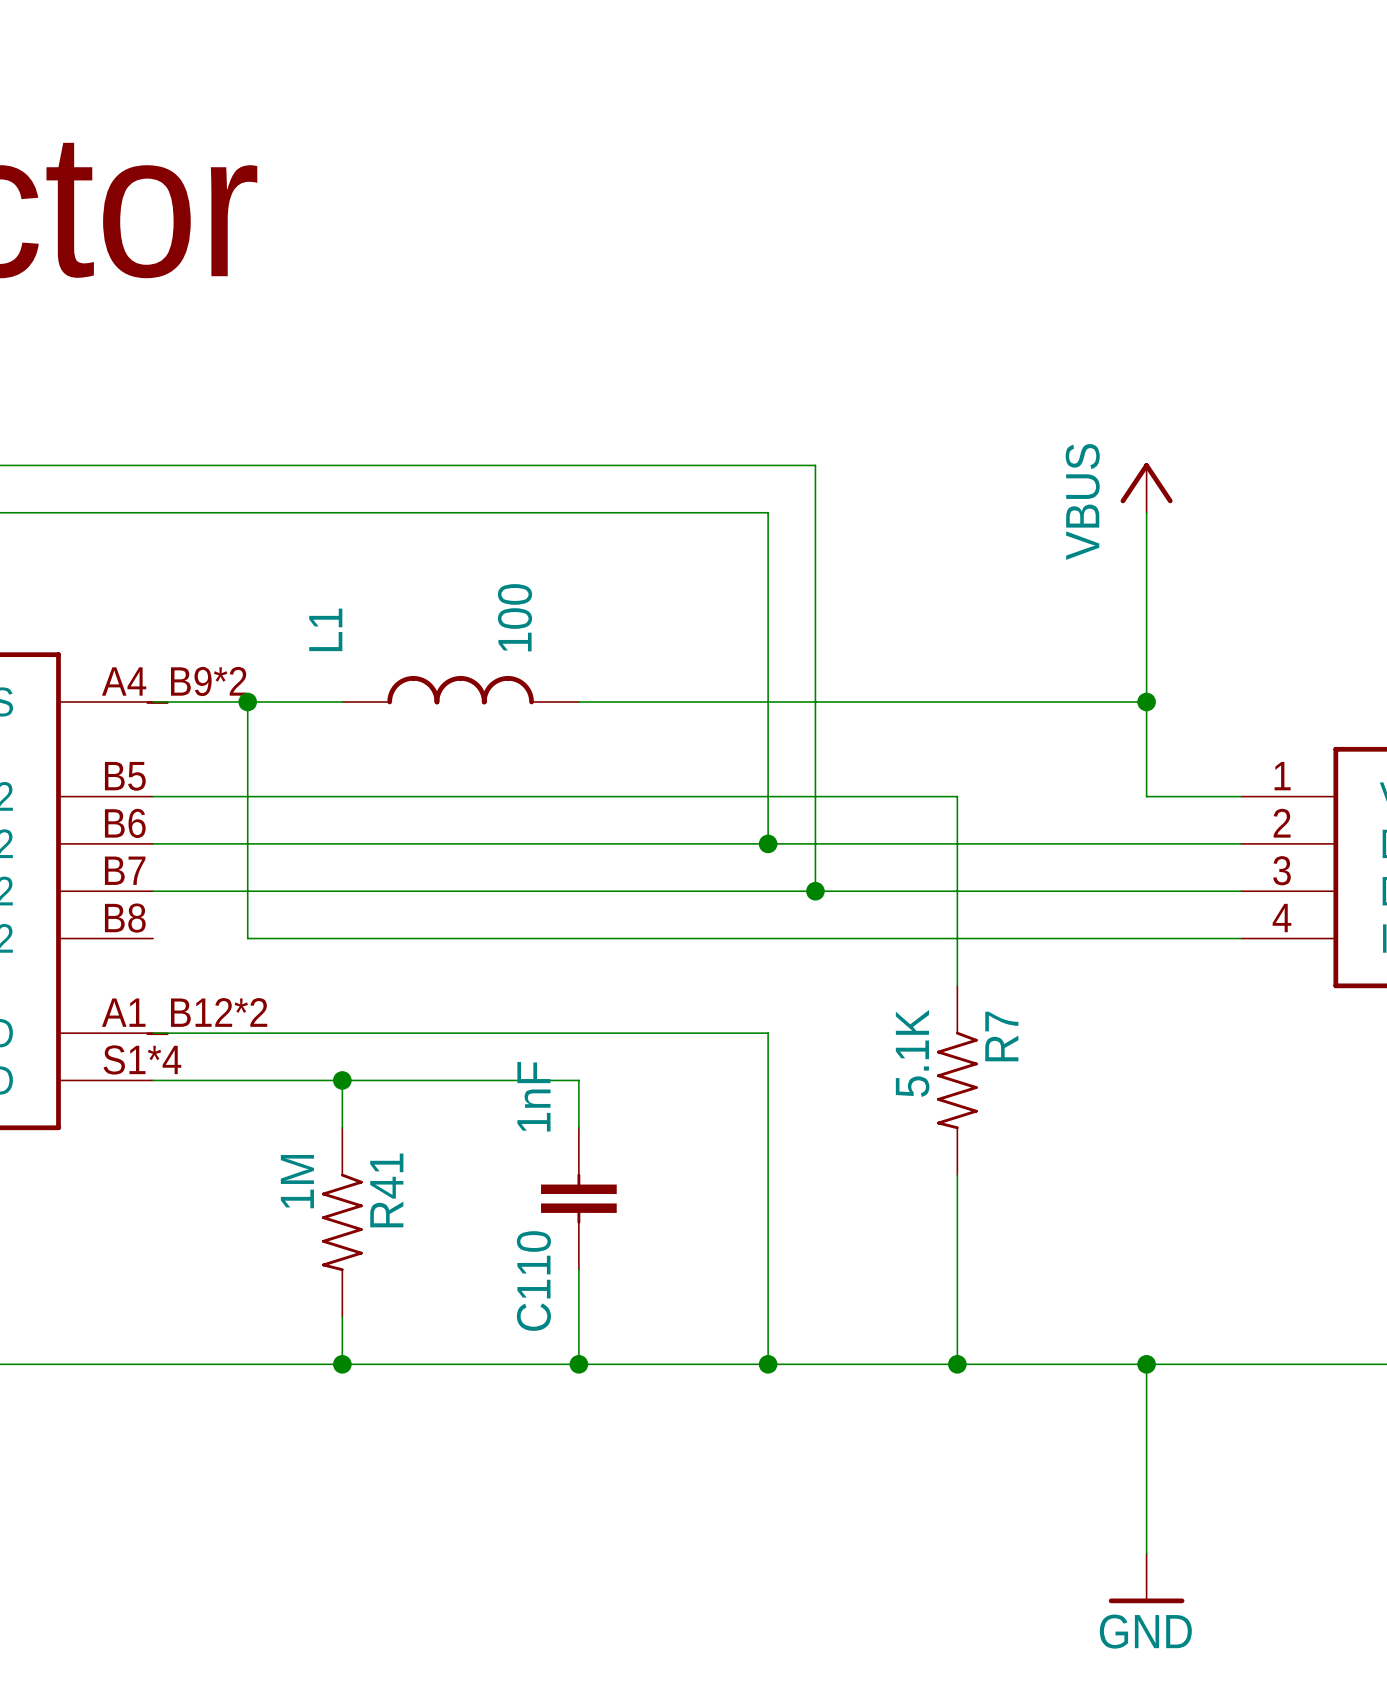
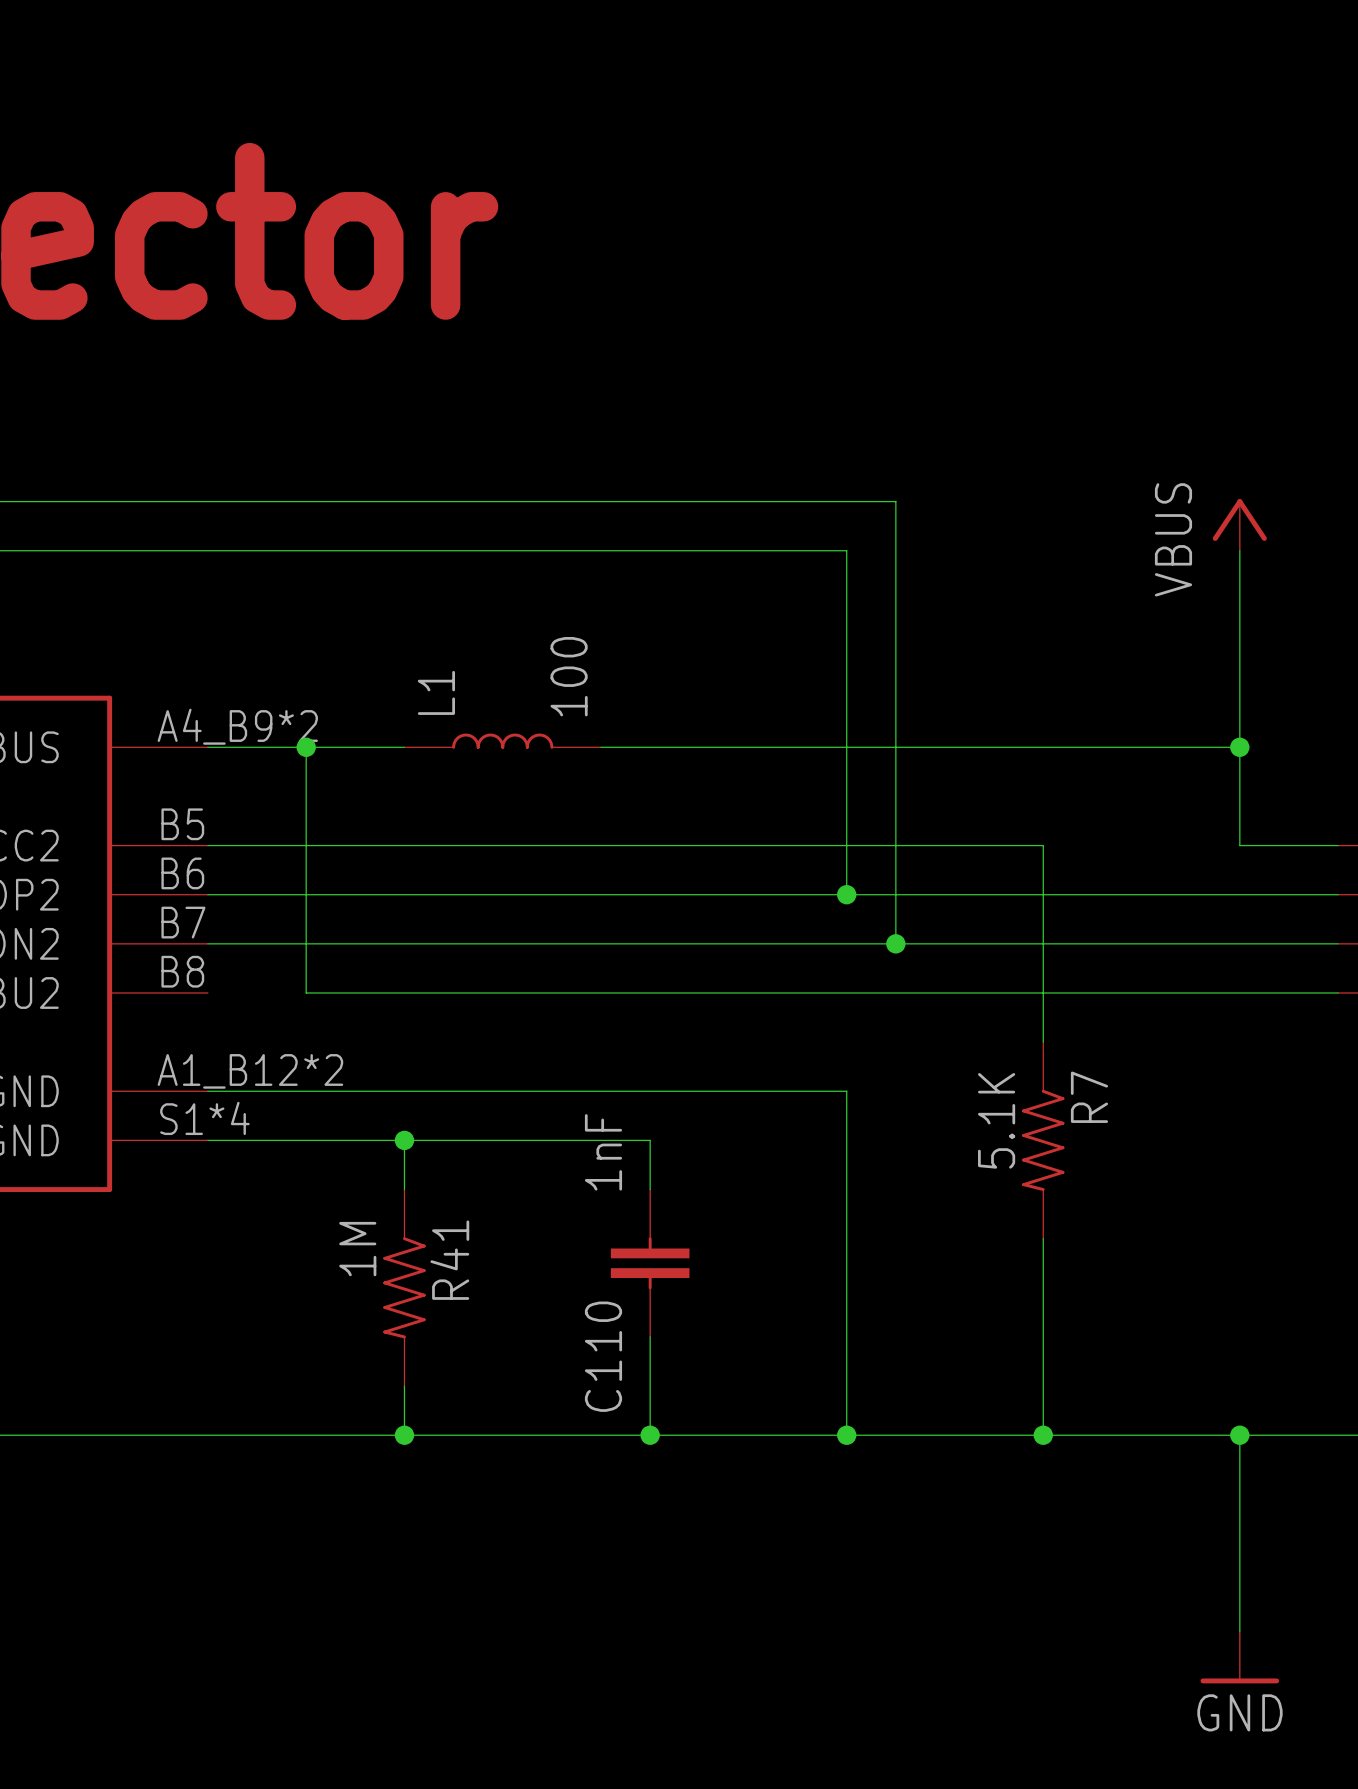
L1 name position: L1 (325, 629) -> L1 (436, 692)
L1 symbol: [342, 675, 579, 705] -> [404, 733, 602, 749]

